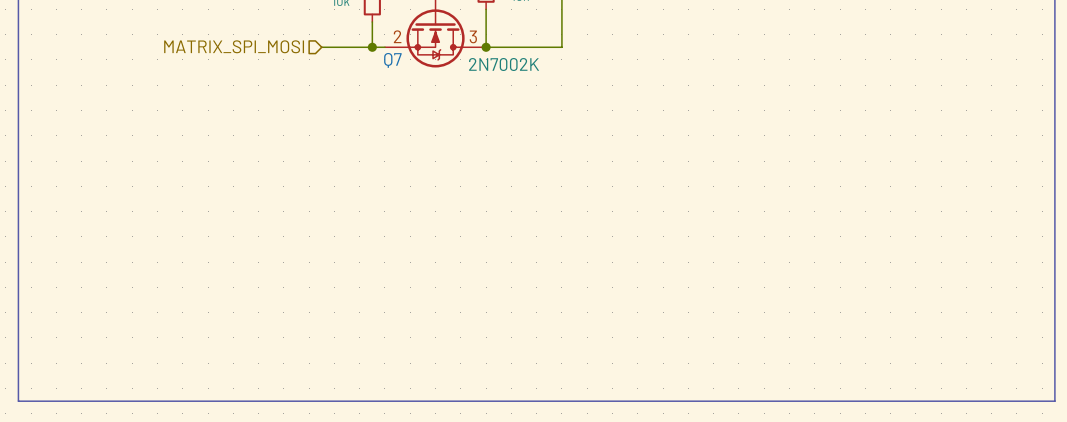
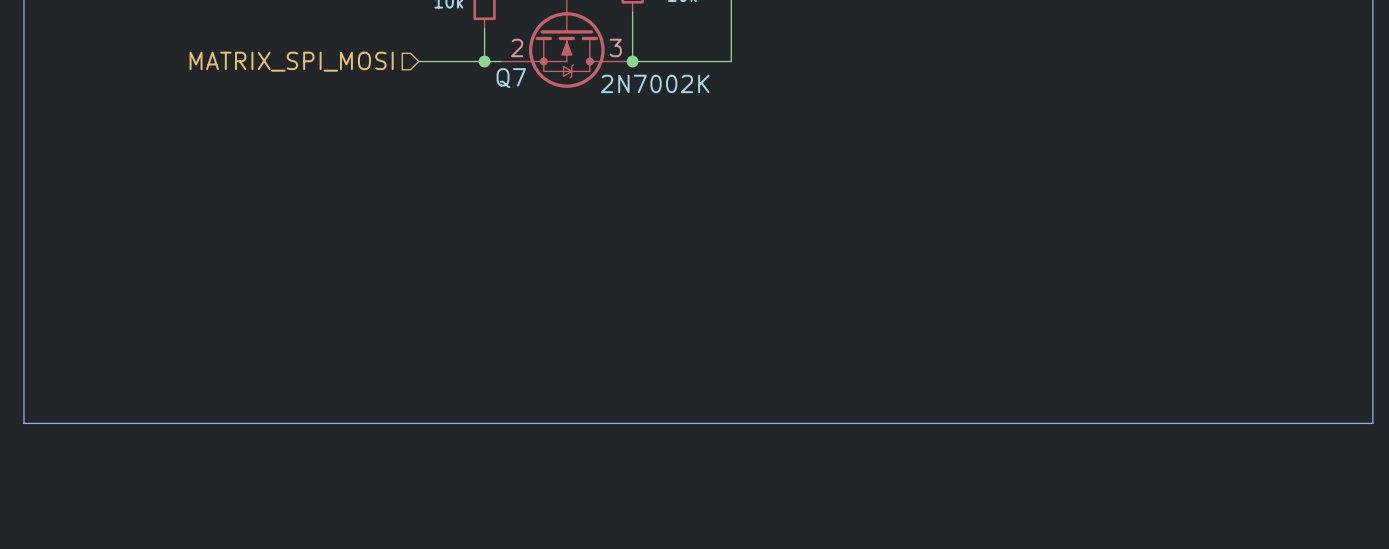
line: (18, 325) (18, 401) (1054, 401) (1054, 325) -> (23, 423) (1372, 423)

